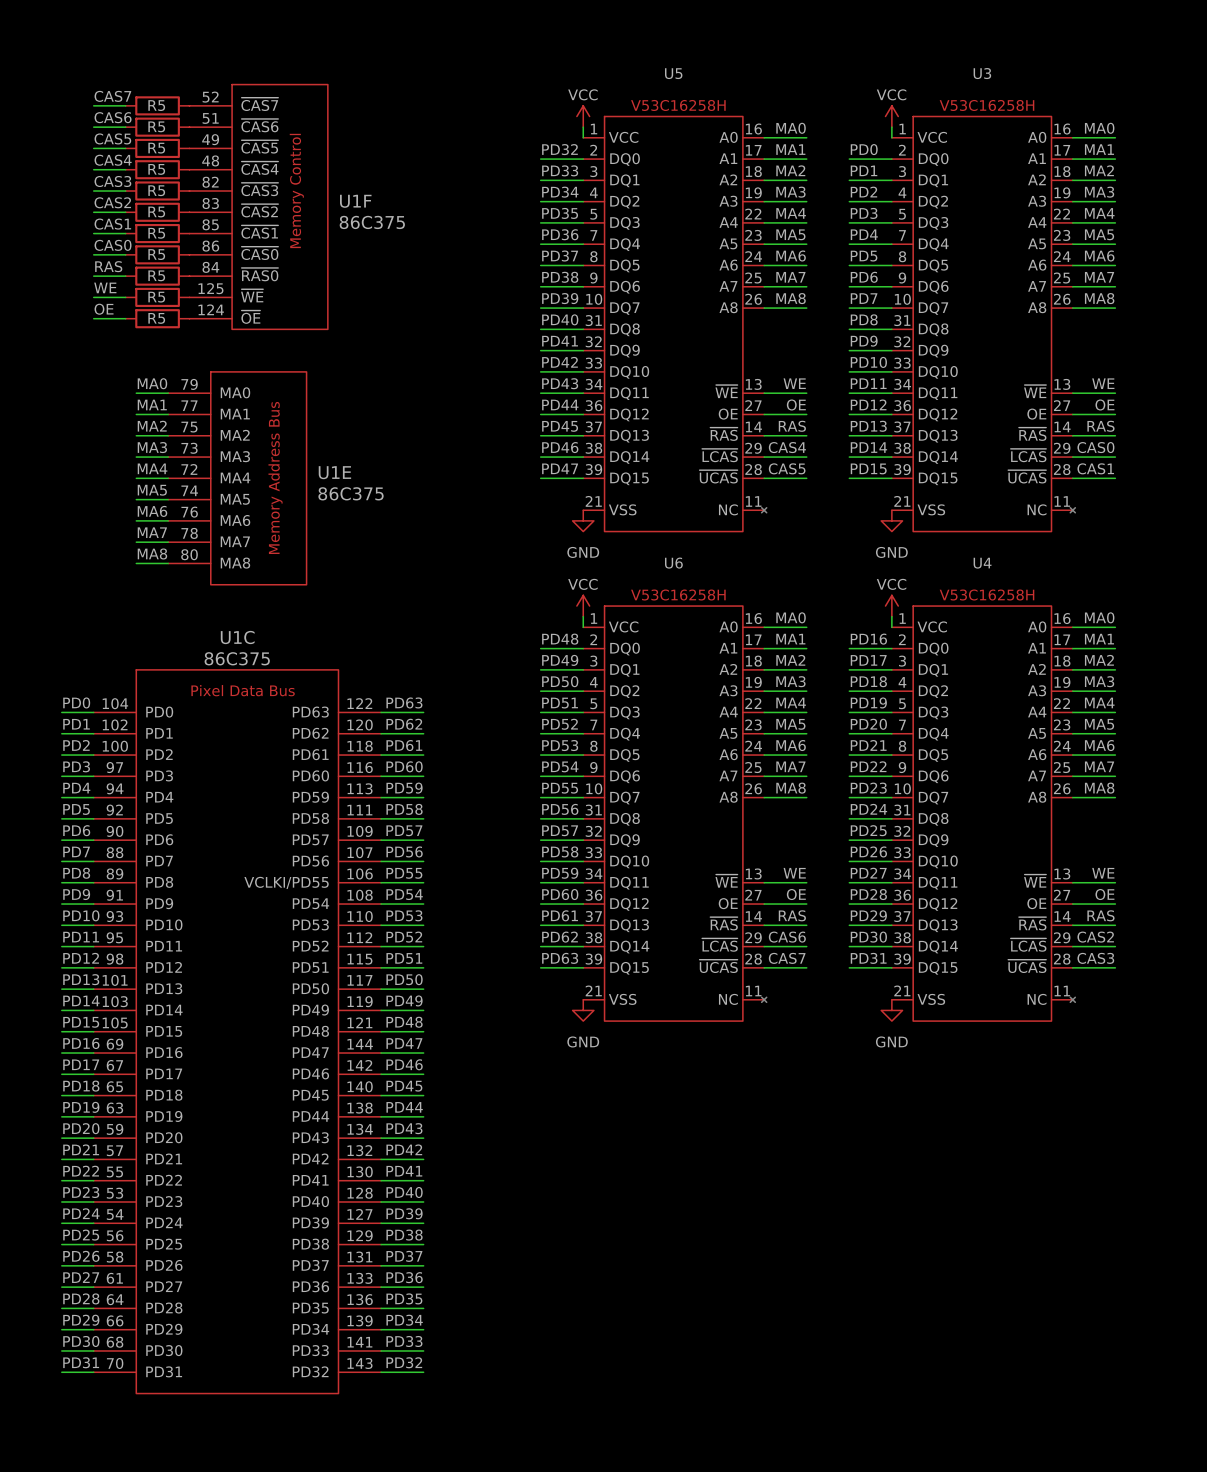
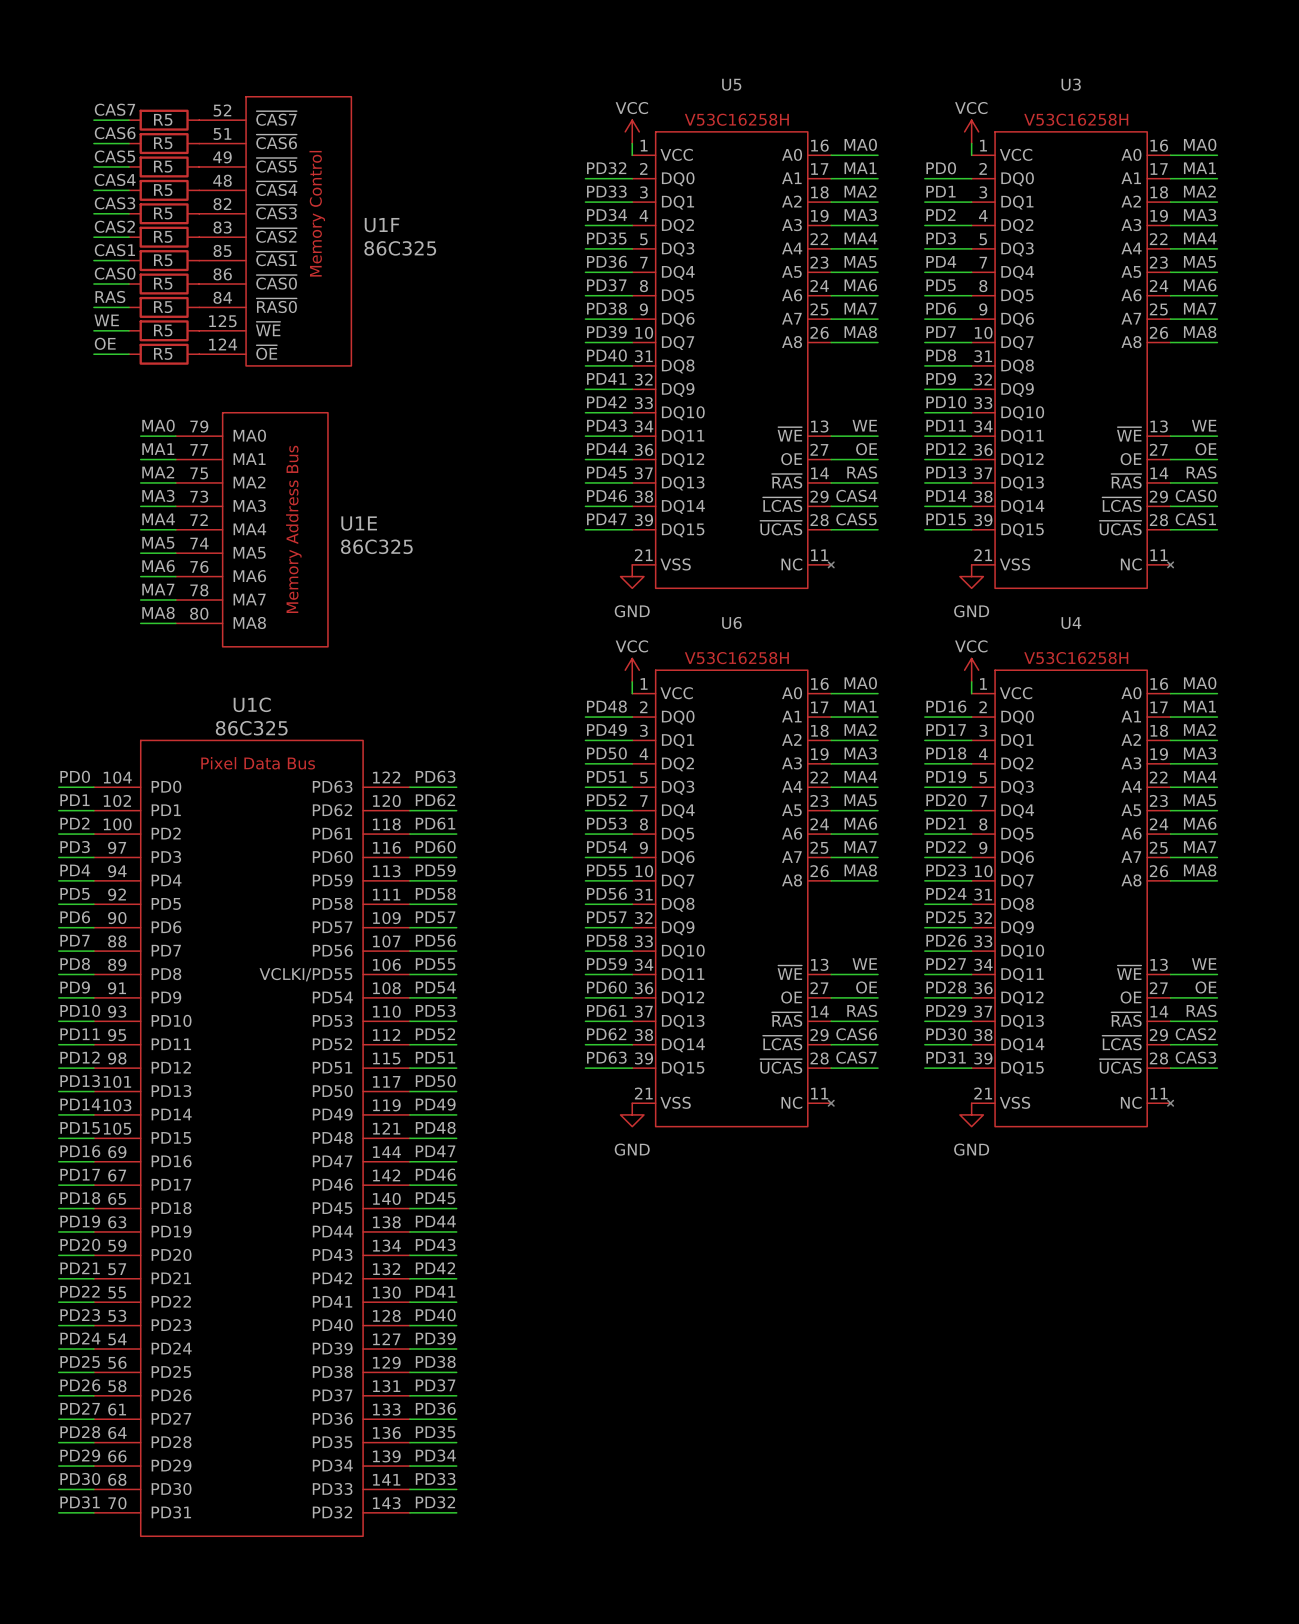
U1F value: 86C375 (372, 222) -> 86C325 (400, 248)
U1E value: 86C375 (351, 493) -> 86C325 (376, 546)
U1C value: 86C375 (237, 658) -> 86C325 (251, 728)

